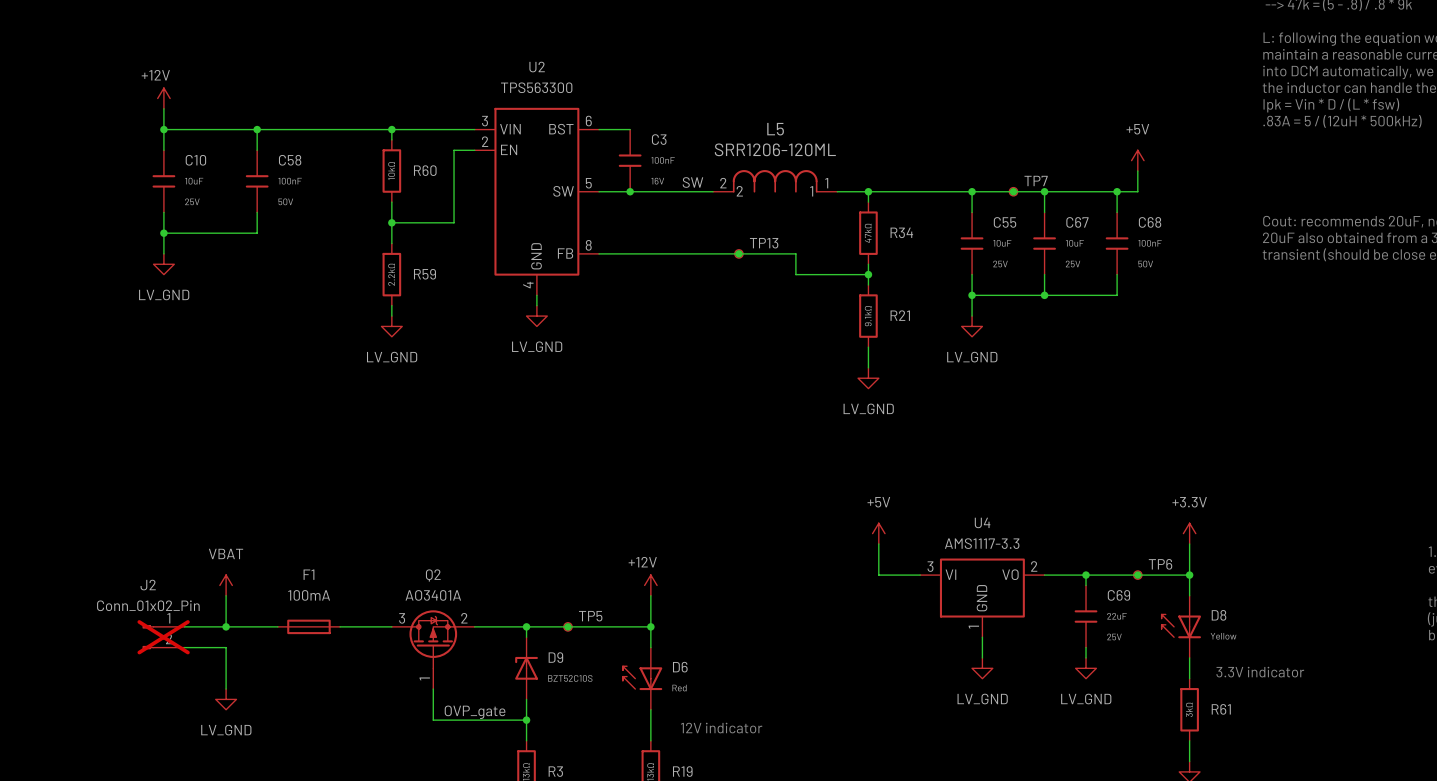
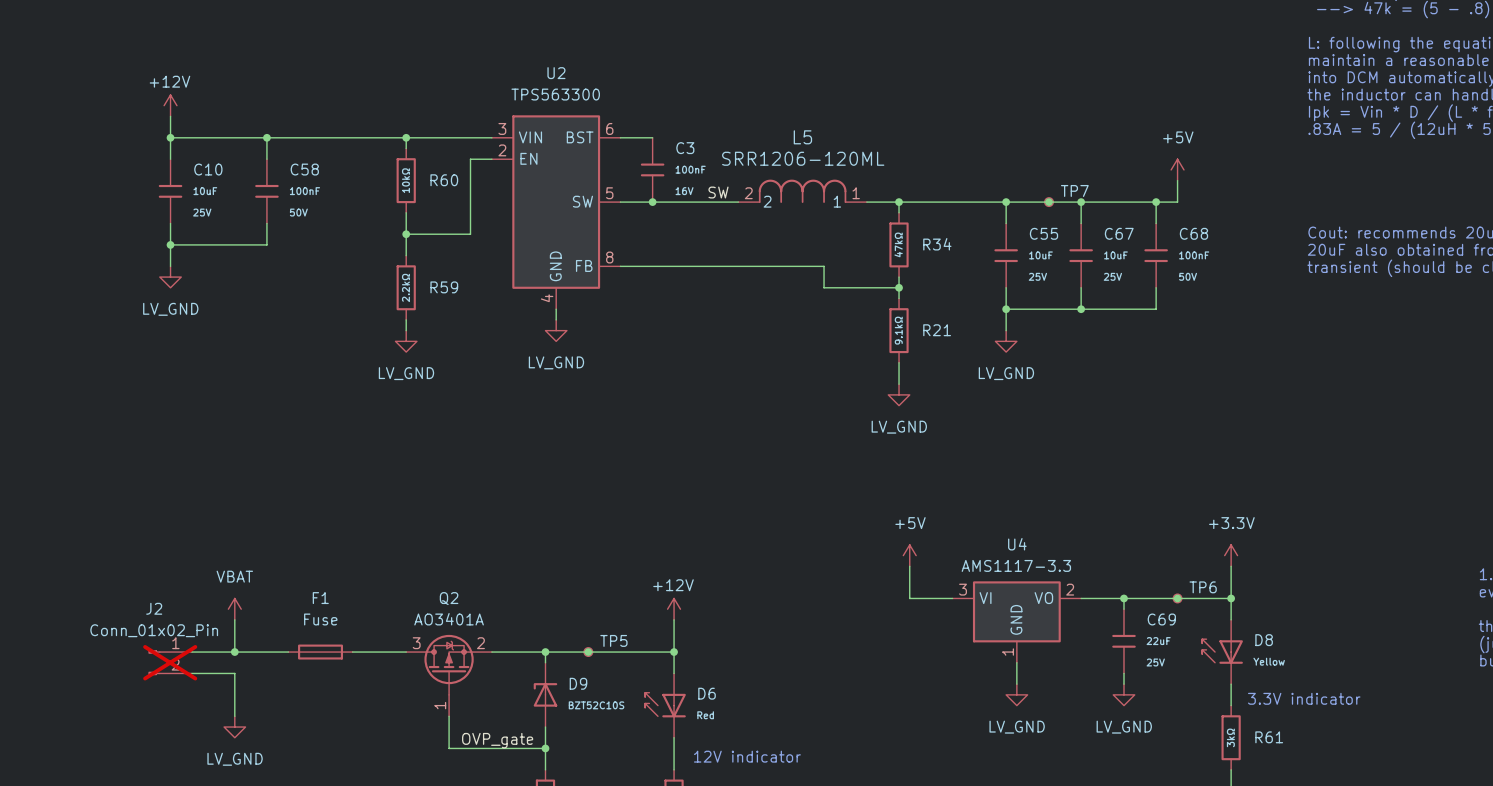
junction: (738, 253) -> none
TP13: (738, 253) -> none
F1 value: 100mA (309, 595) -> Fuse (320, 619)

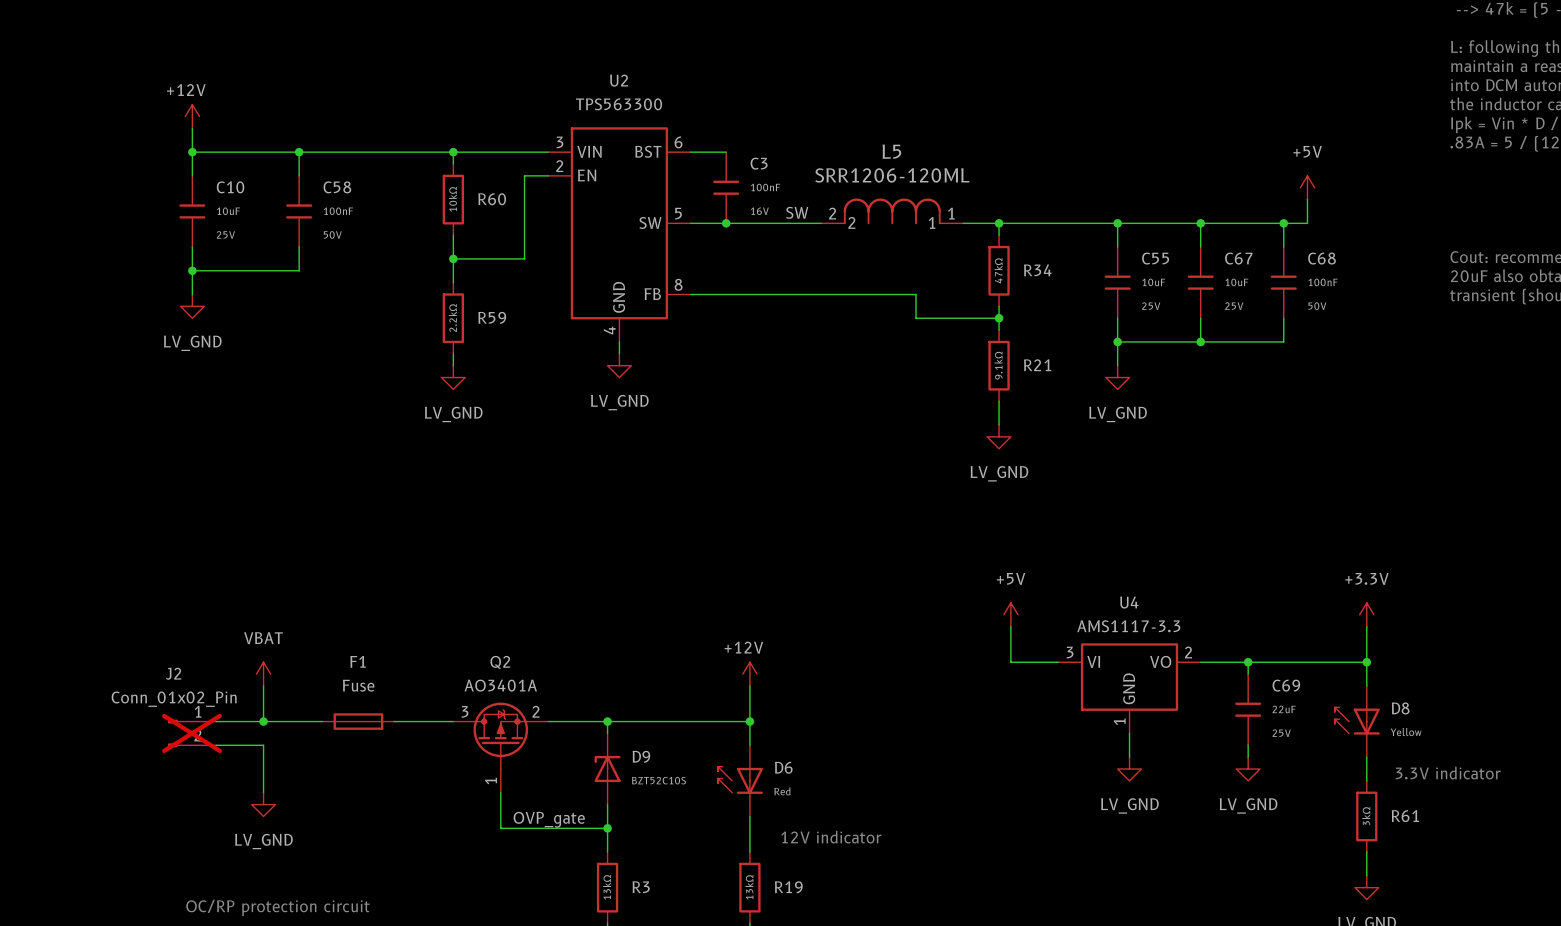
junction: (1049, 202) -> none
TP7: (1049, 202) -> none
junction: (1177, 598) -> none
TP6: (1177, 598) -> none
junction: (588, 652) -> none
TP5: (588, 652) -> none

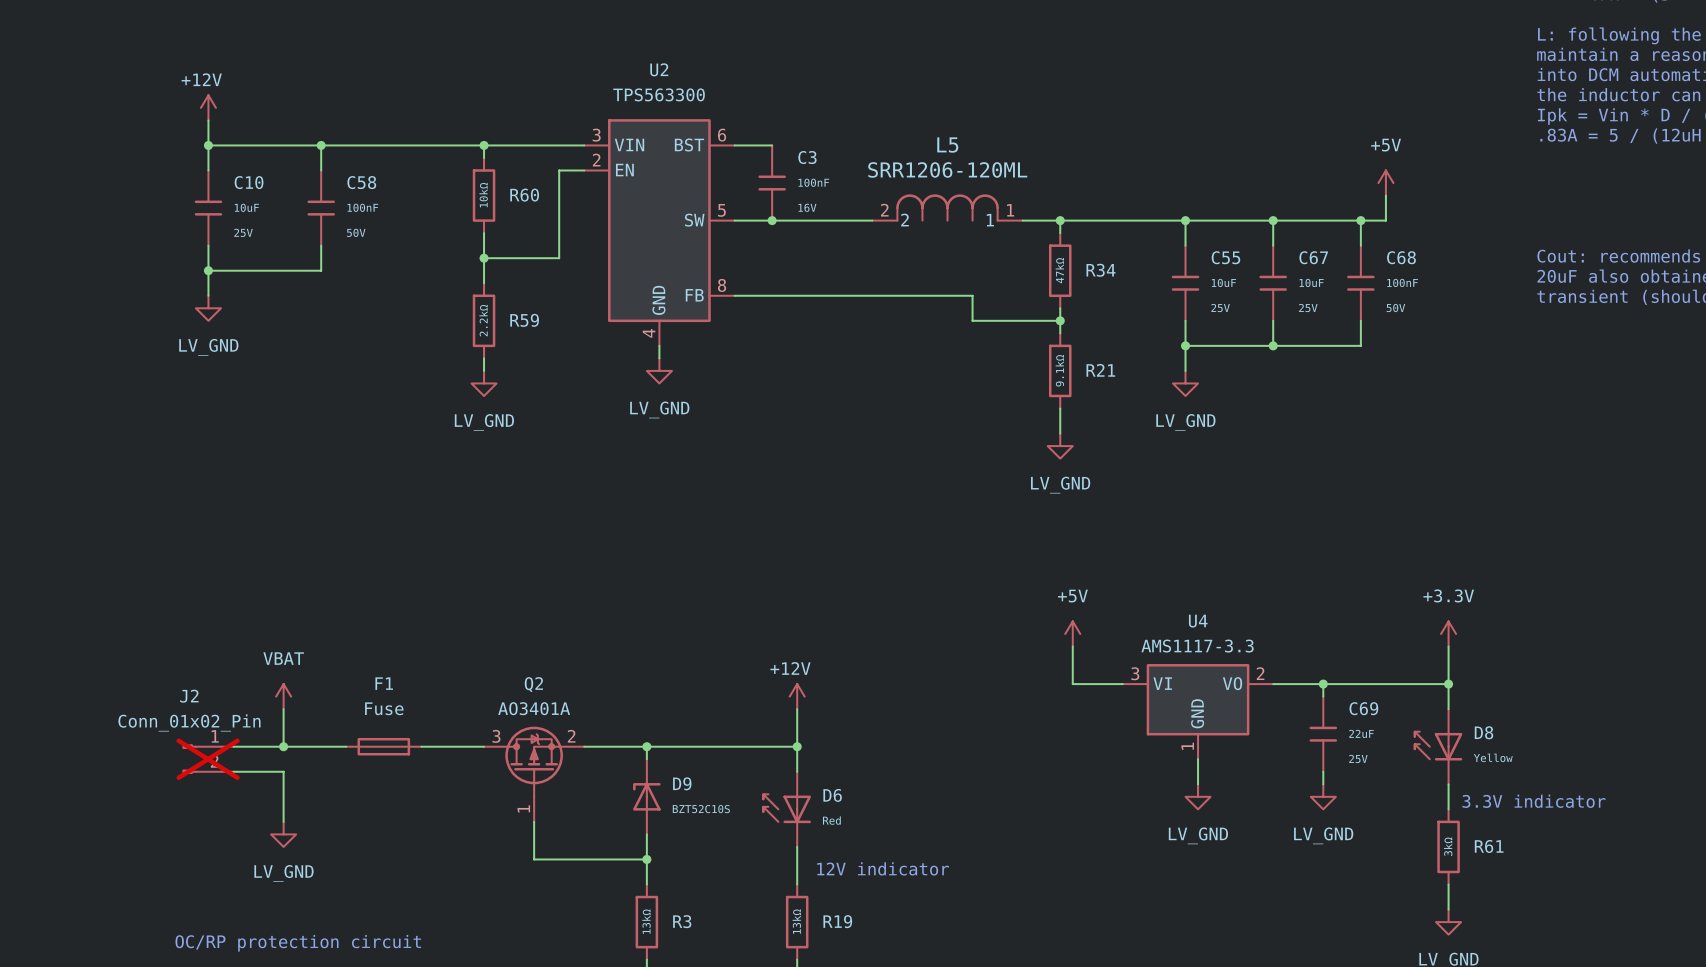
label: SW (797, 212) -> none
label: OVP_gate (549, 819) -> none

